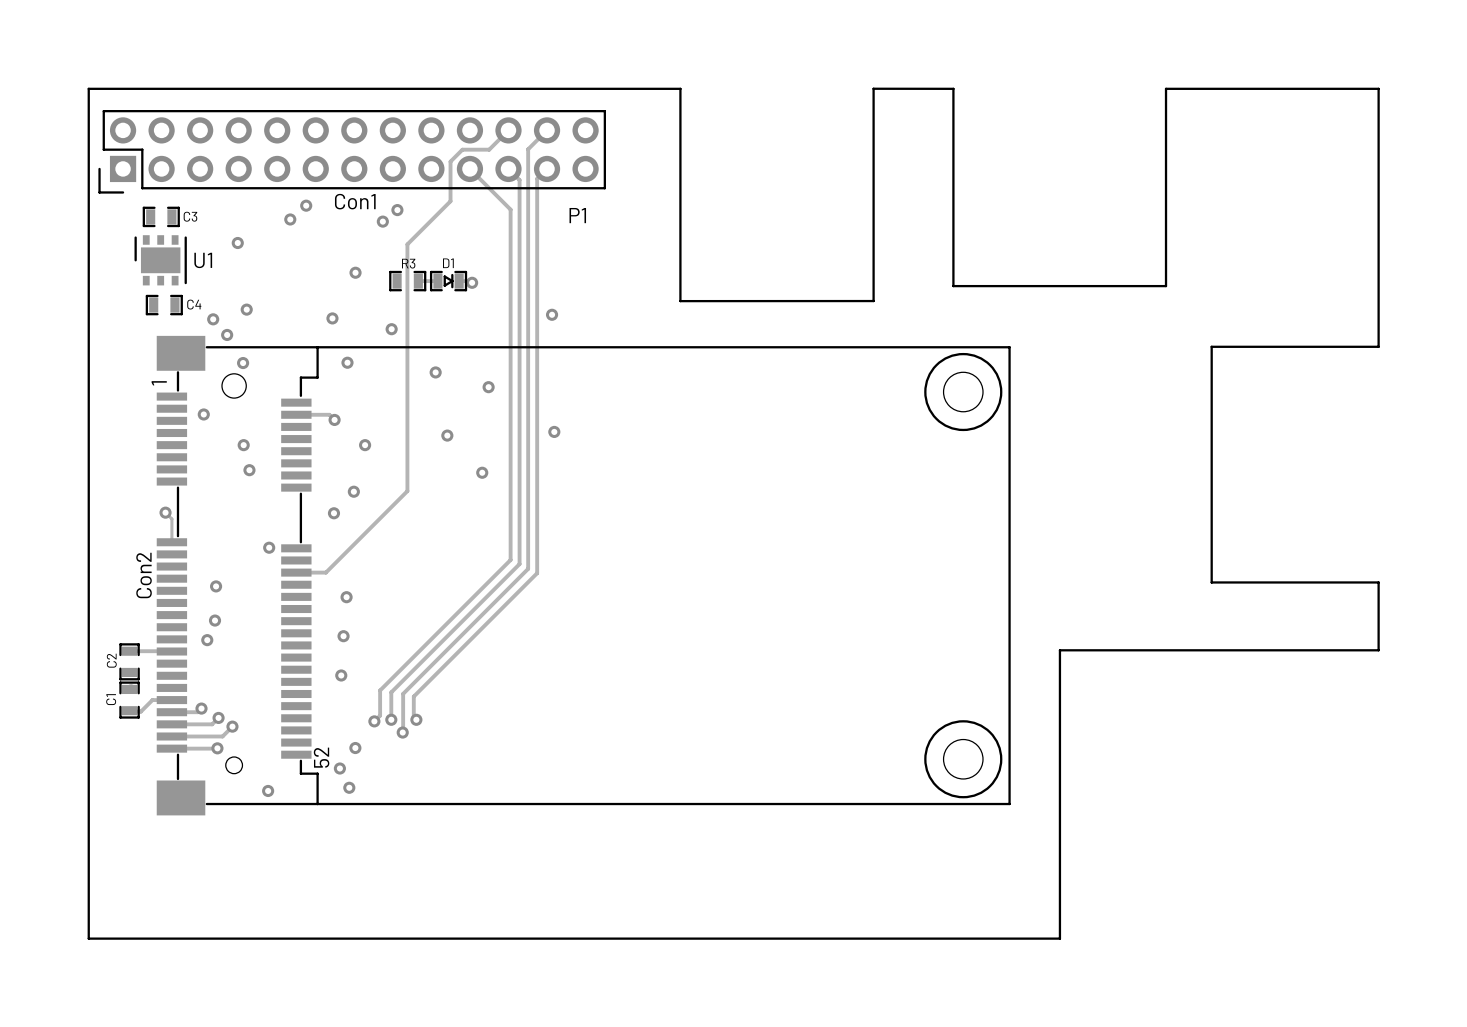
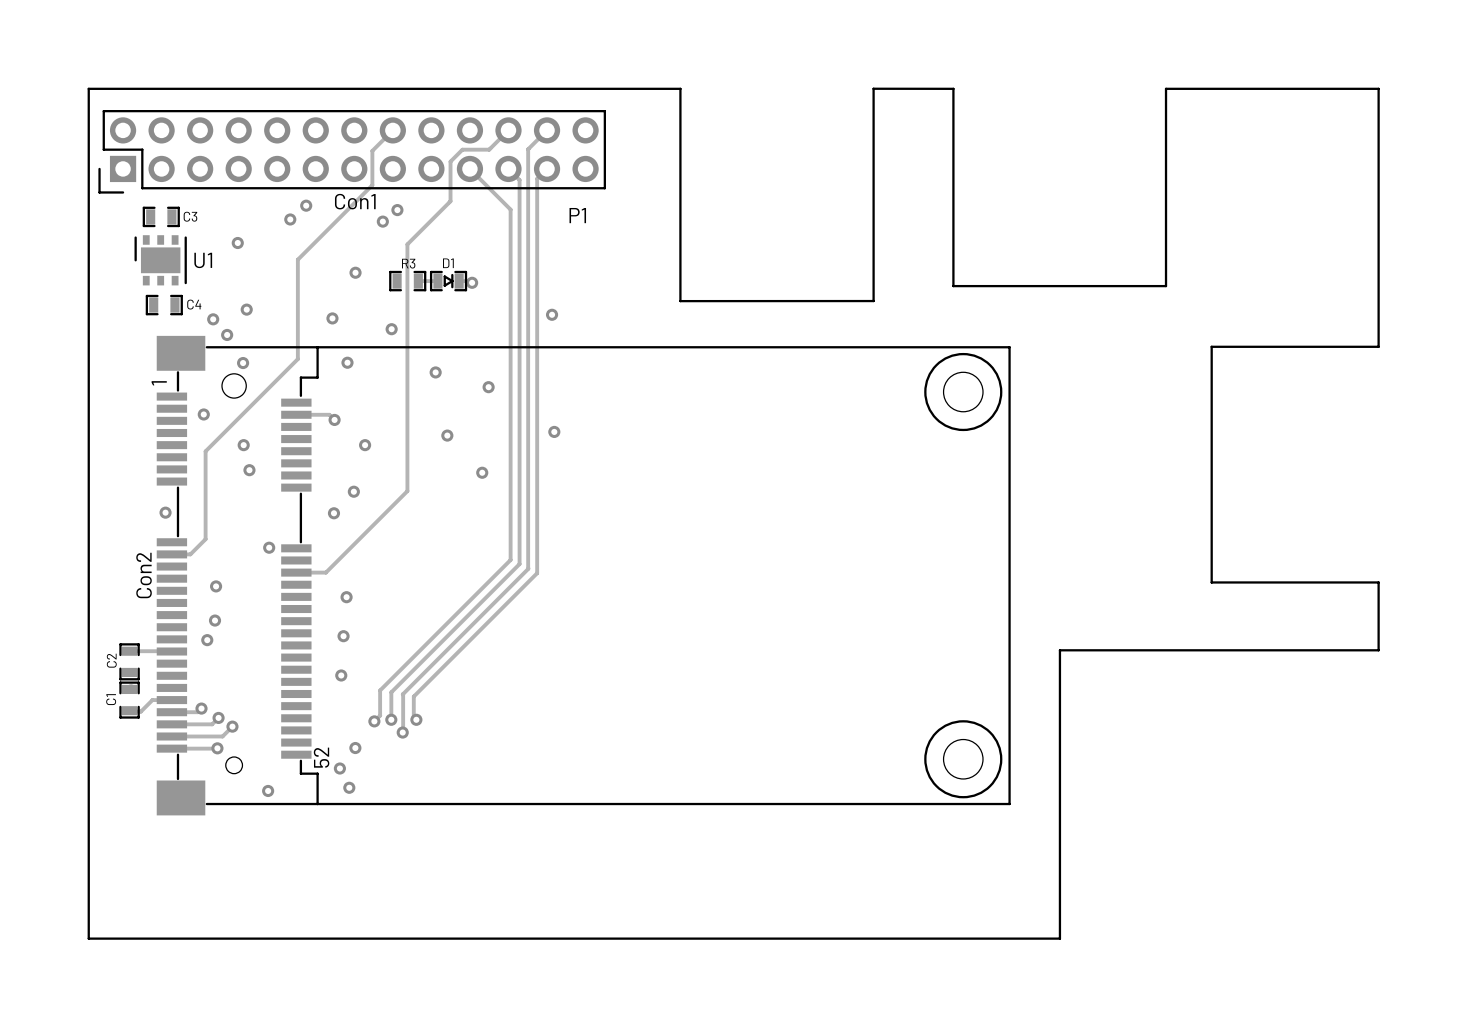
track: none -> (392, 130) (372, 150) (372, 185) (297, 259) (297, 359) (205, 451) (205, 539) (190, 554) (171, 554)
track: (165, 512) (171, 519) (171, 542) -> none

